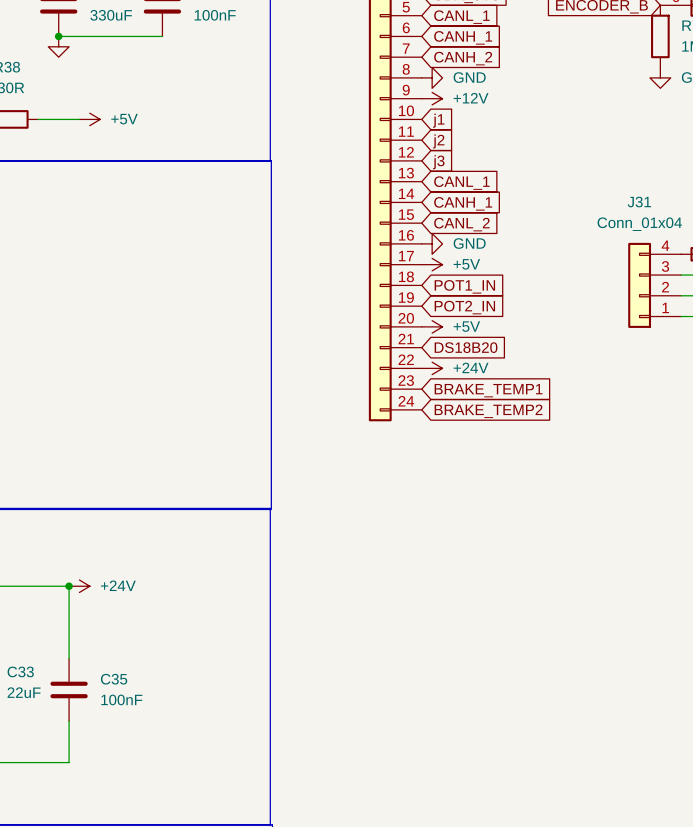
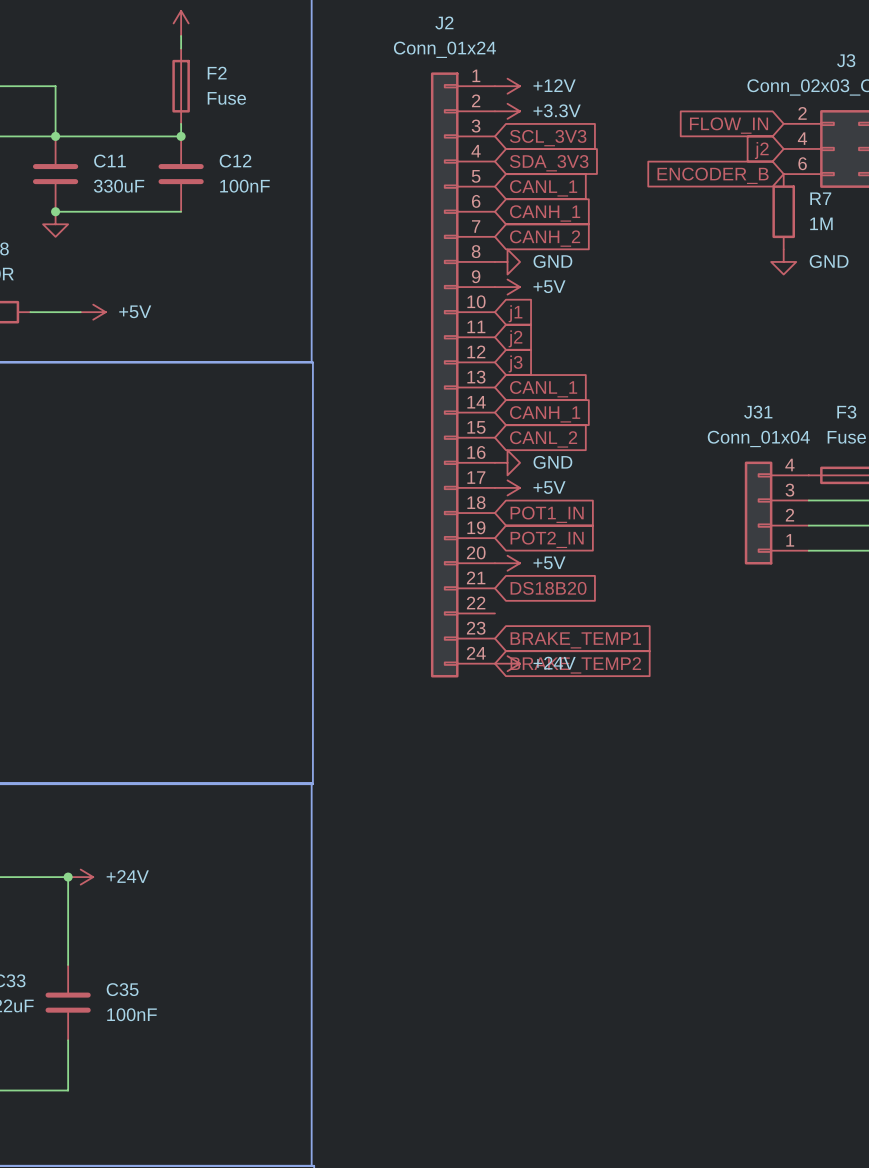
power symbol: +12V (432, 98) -> +5V (507, 287)
power symbol position: +24V (432, 368) -> +24V (507, 663)

